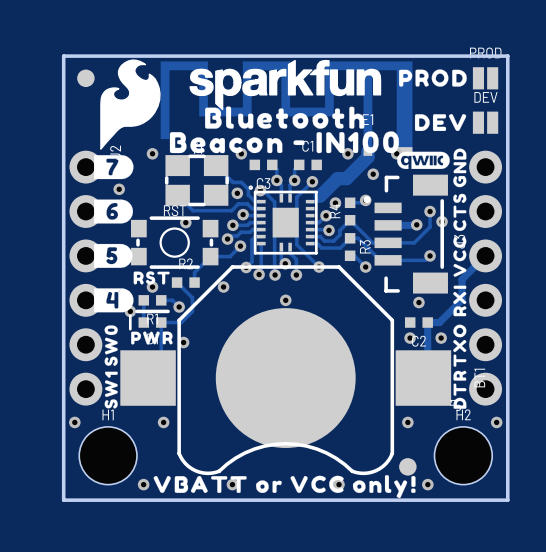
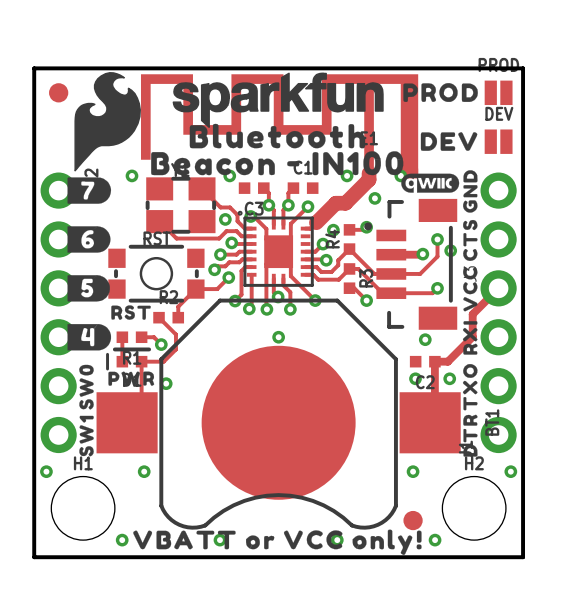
via: (119, 189) -> none
via: (185, 222) -> none
via: (152, 287) -> none
via: (223, 287) -> none
via: (130, 311) -> none

